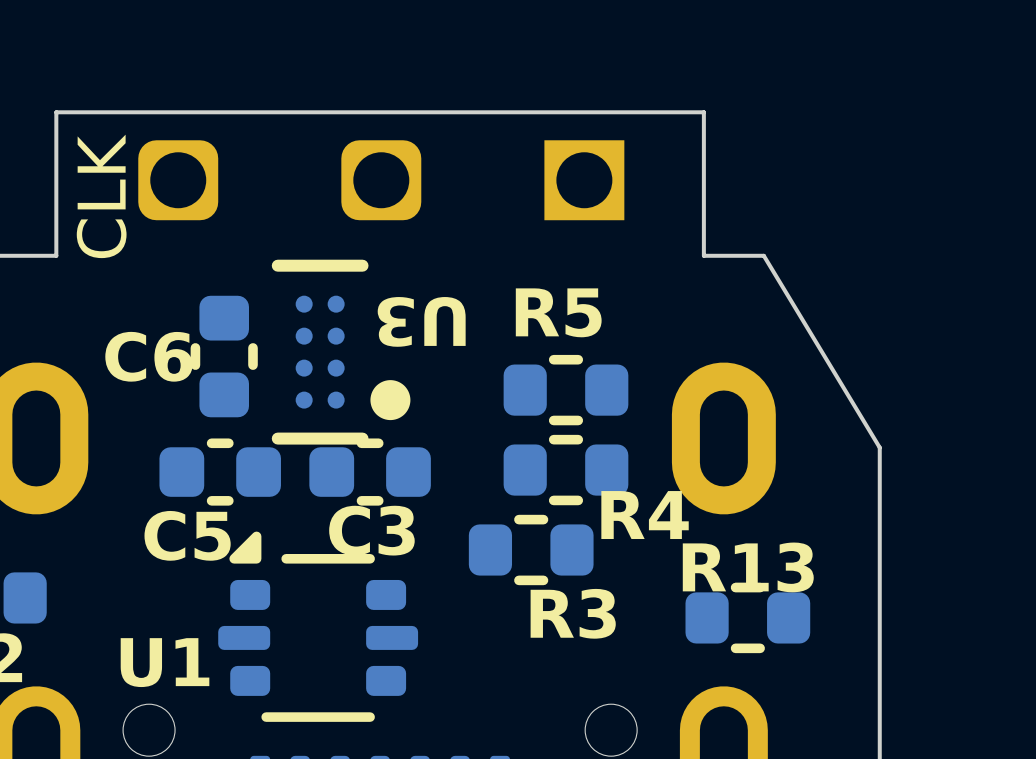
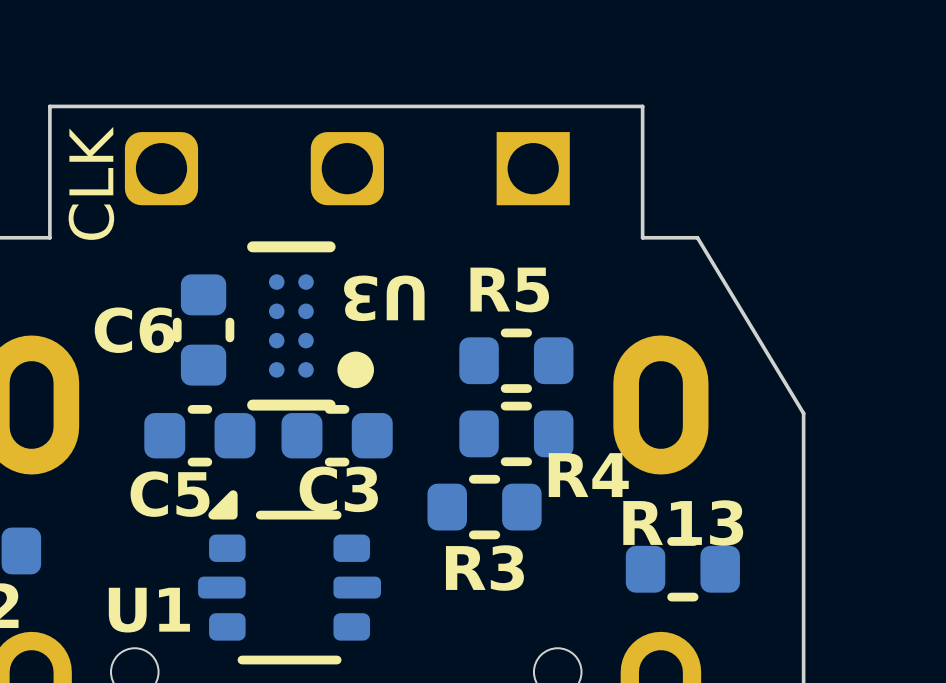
R3 name position: R3 (573, 613) -> R3 (484, 568)

